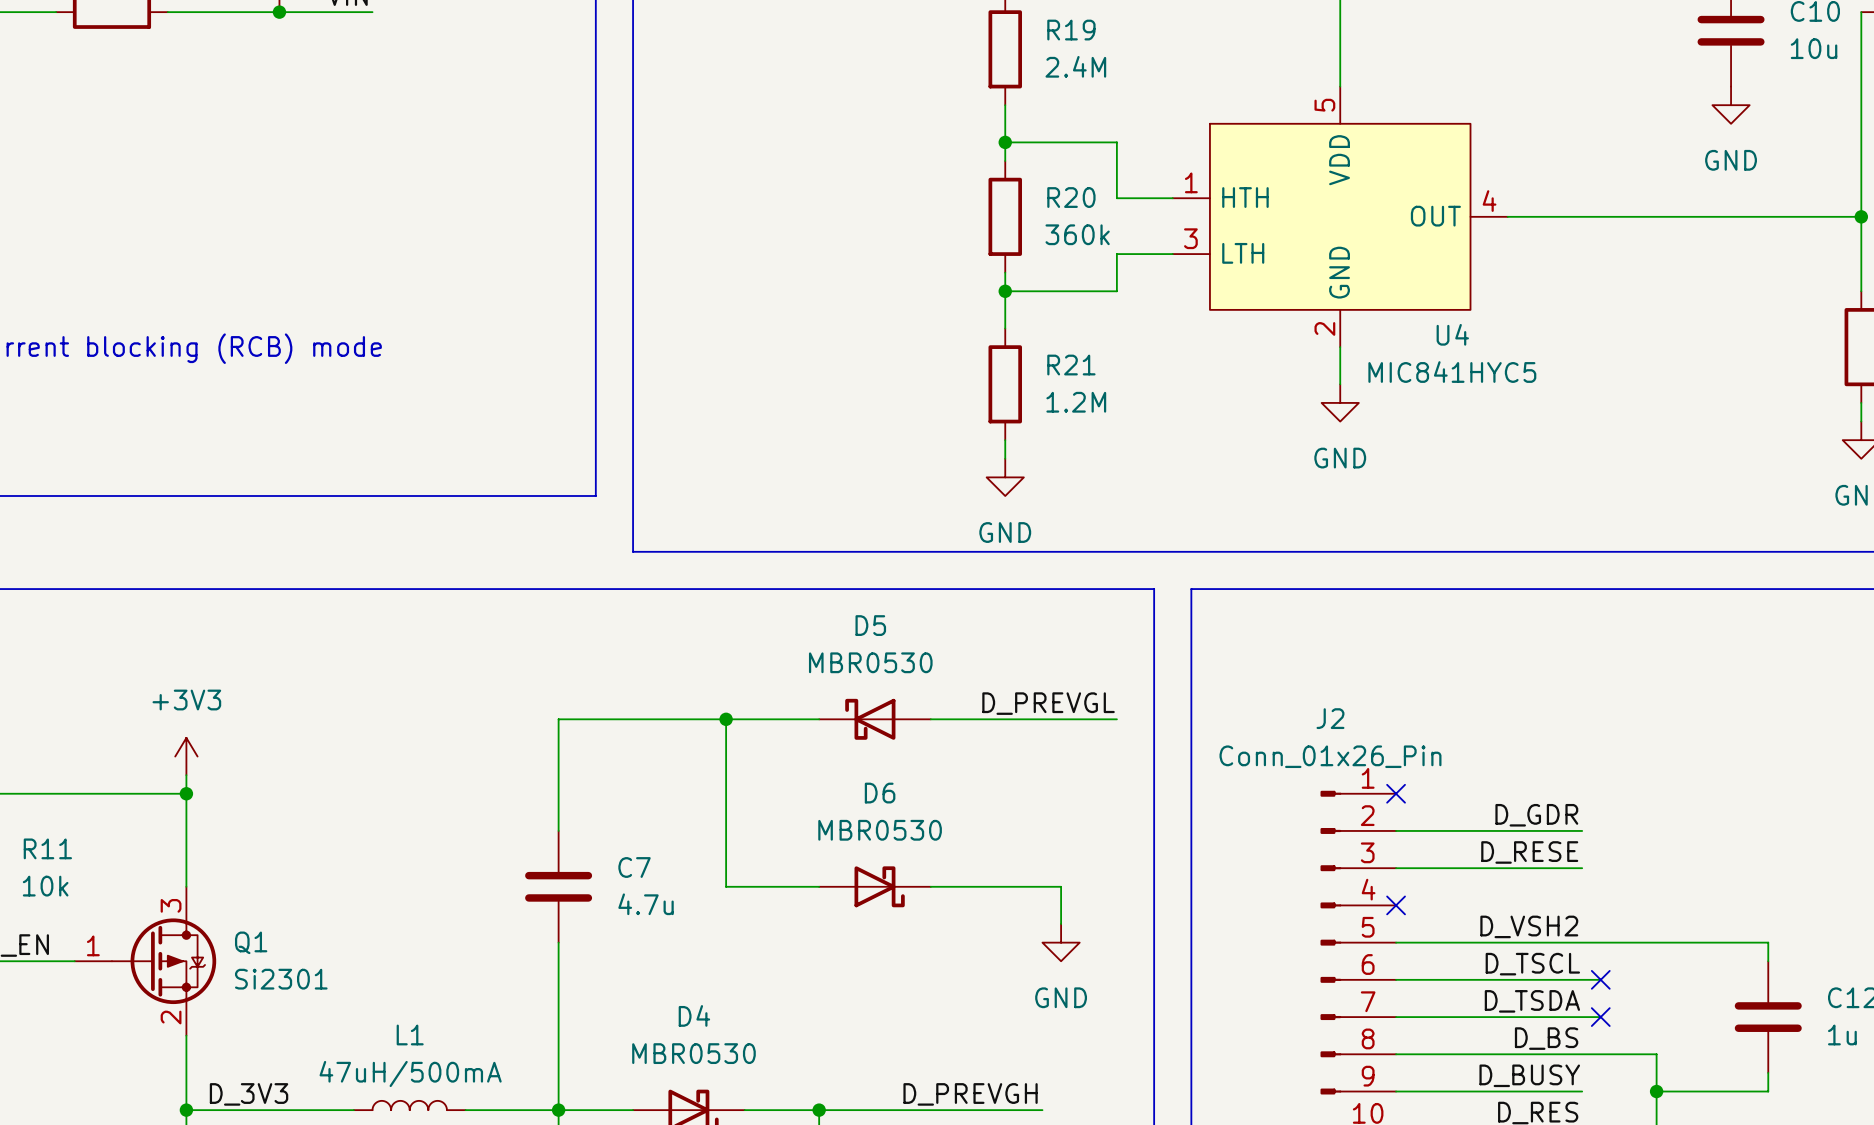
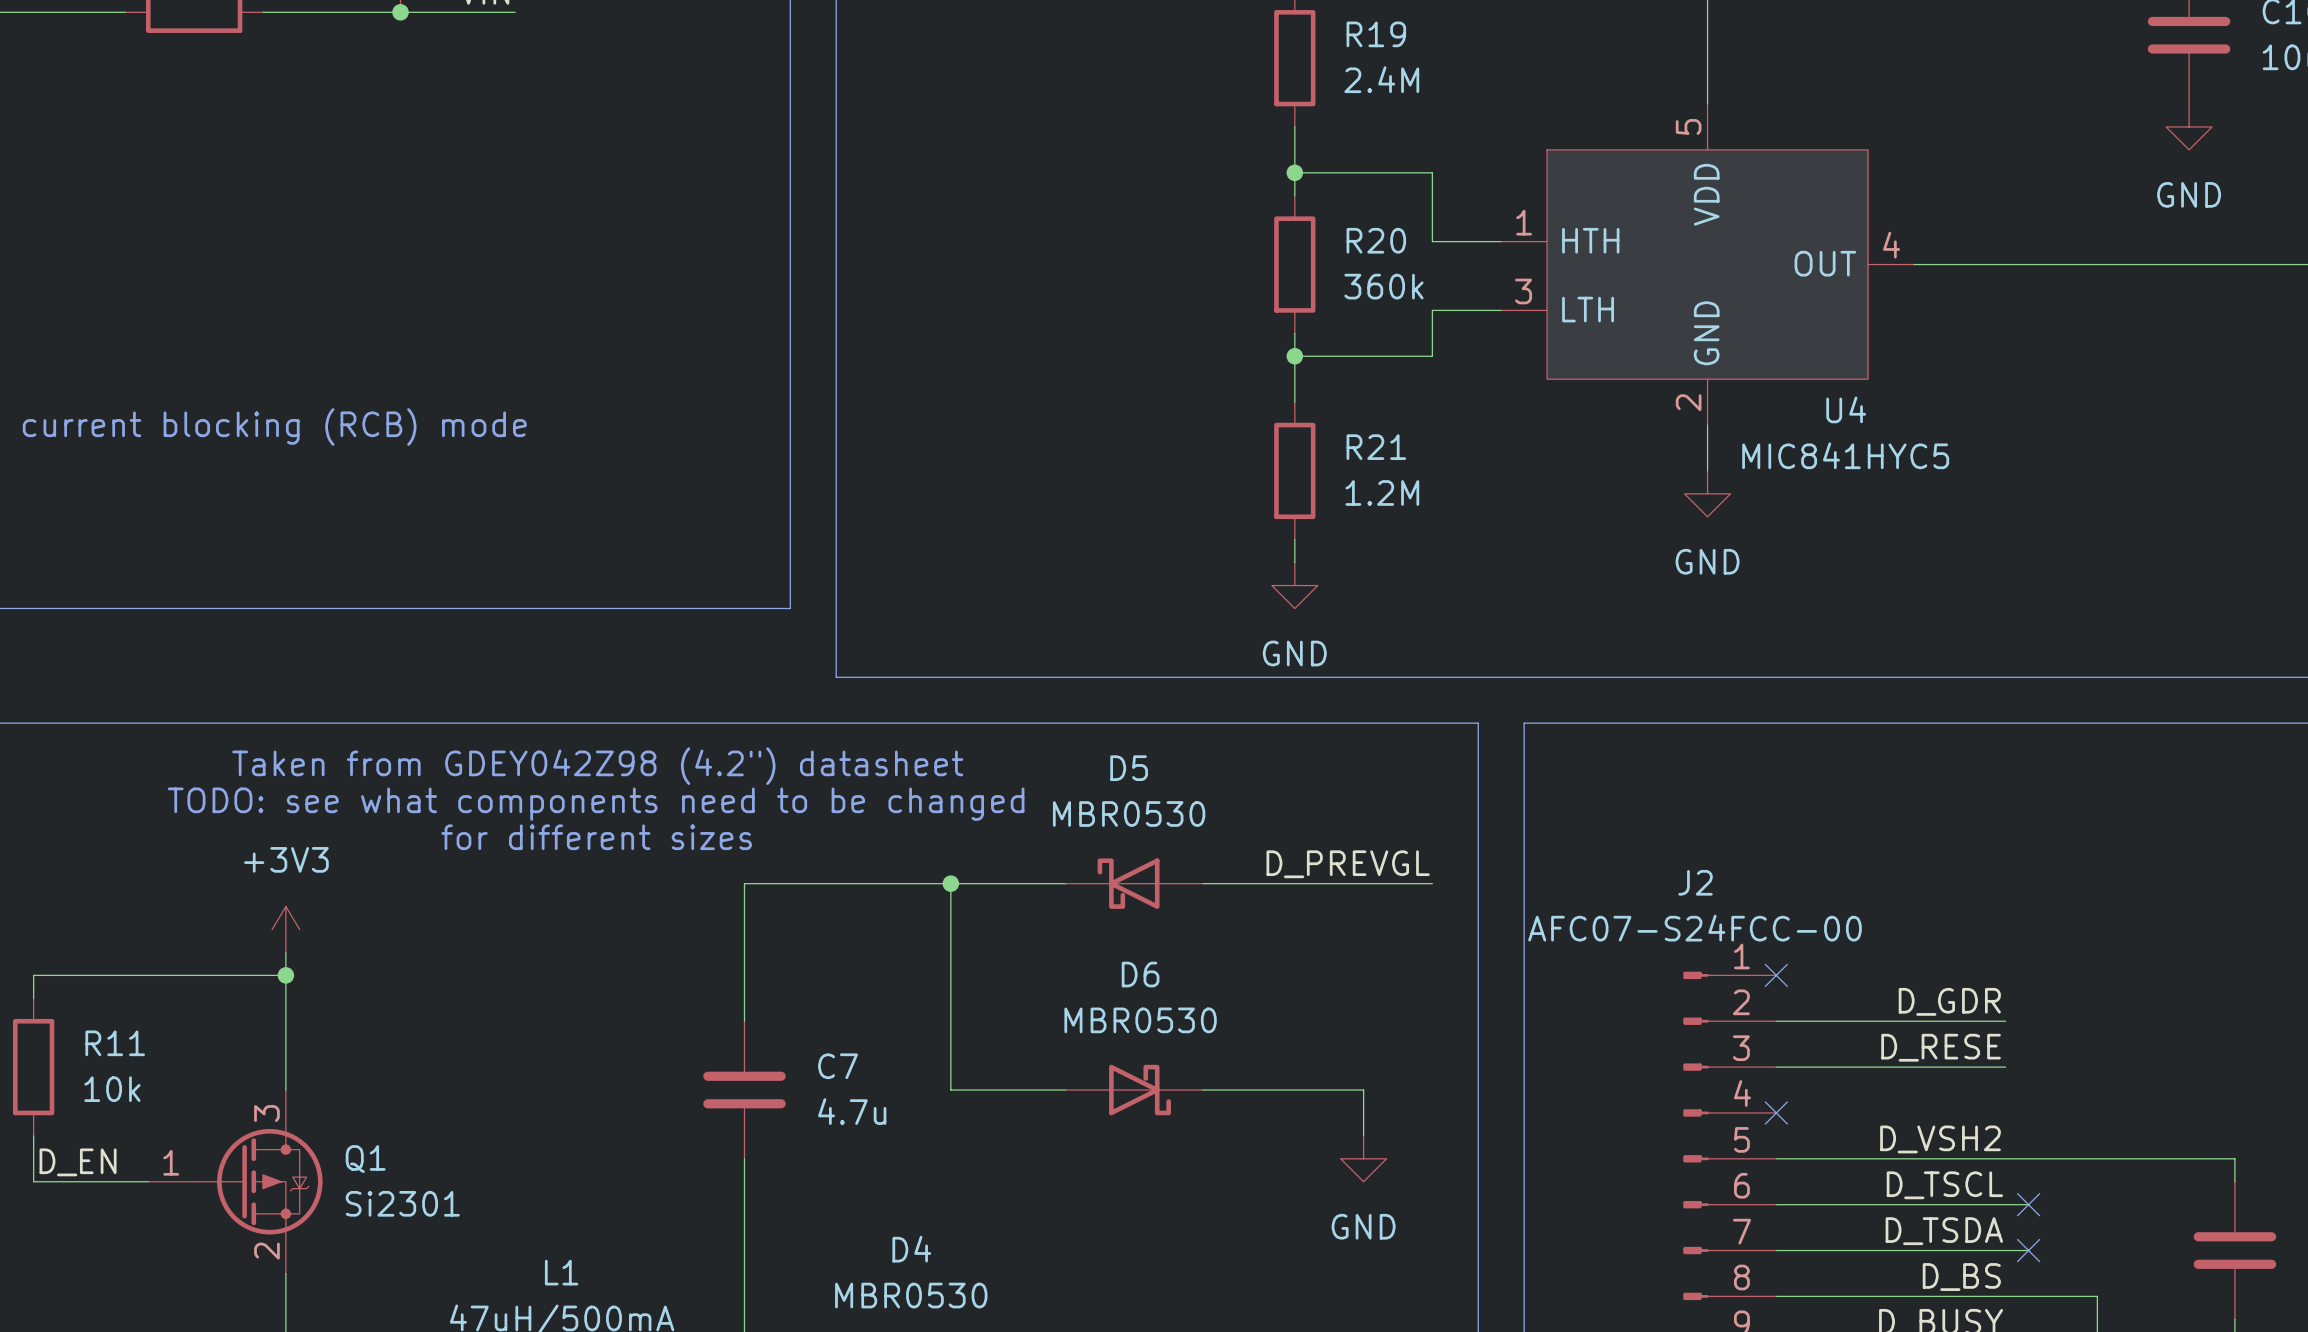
text: none -> Taken from GDEY042Z98 (4.2") datasheet (597, 766)
text: none -> TODO: see what components need to be changed (596, 804)
text: none -> for different sizes (596, 837)
J2 value: Conn_01x26_Pin (1330, 756) -> AFC07-S24FCC-00 (1694, 928)

